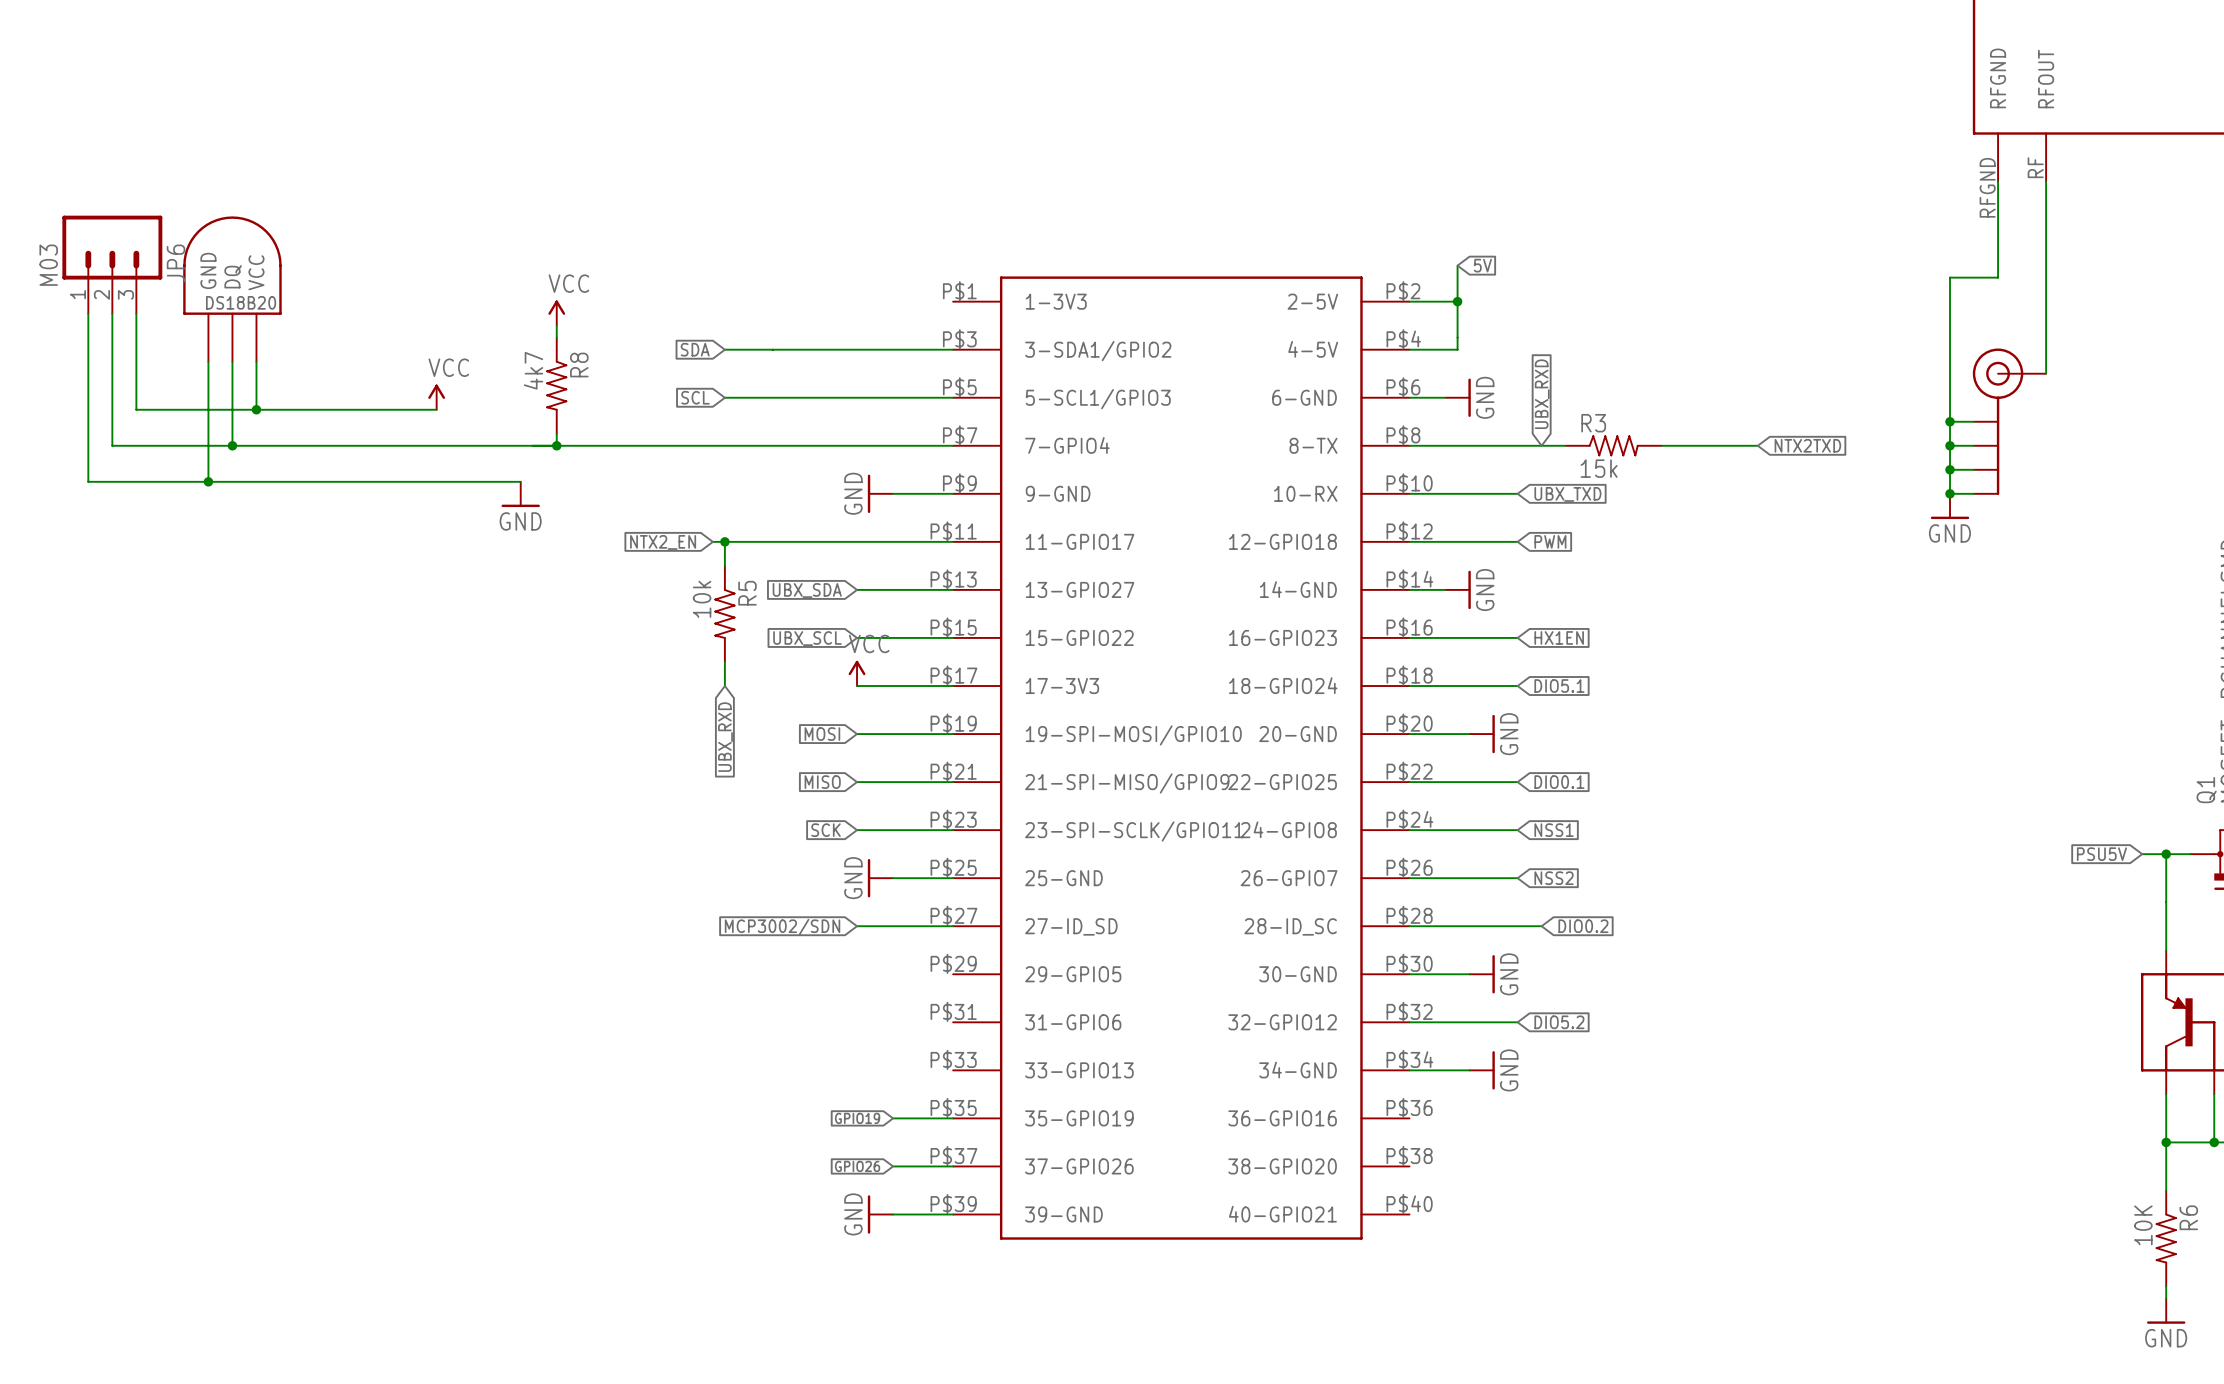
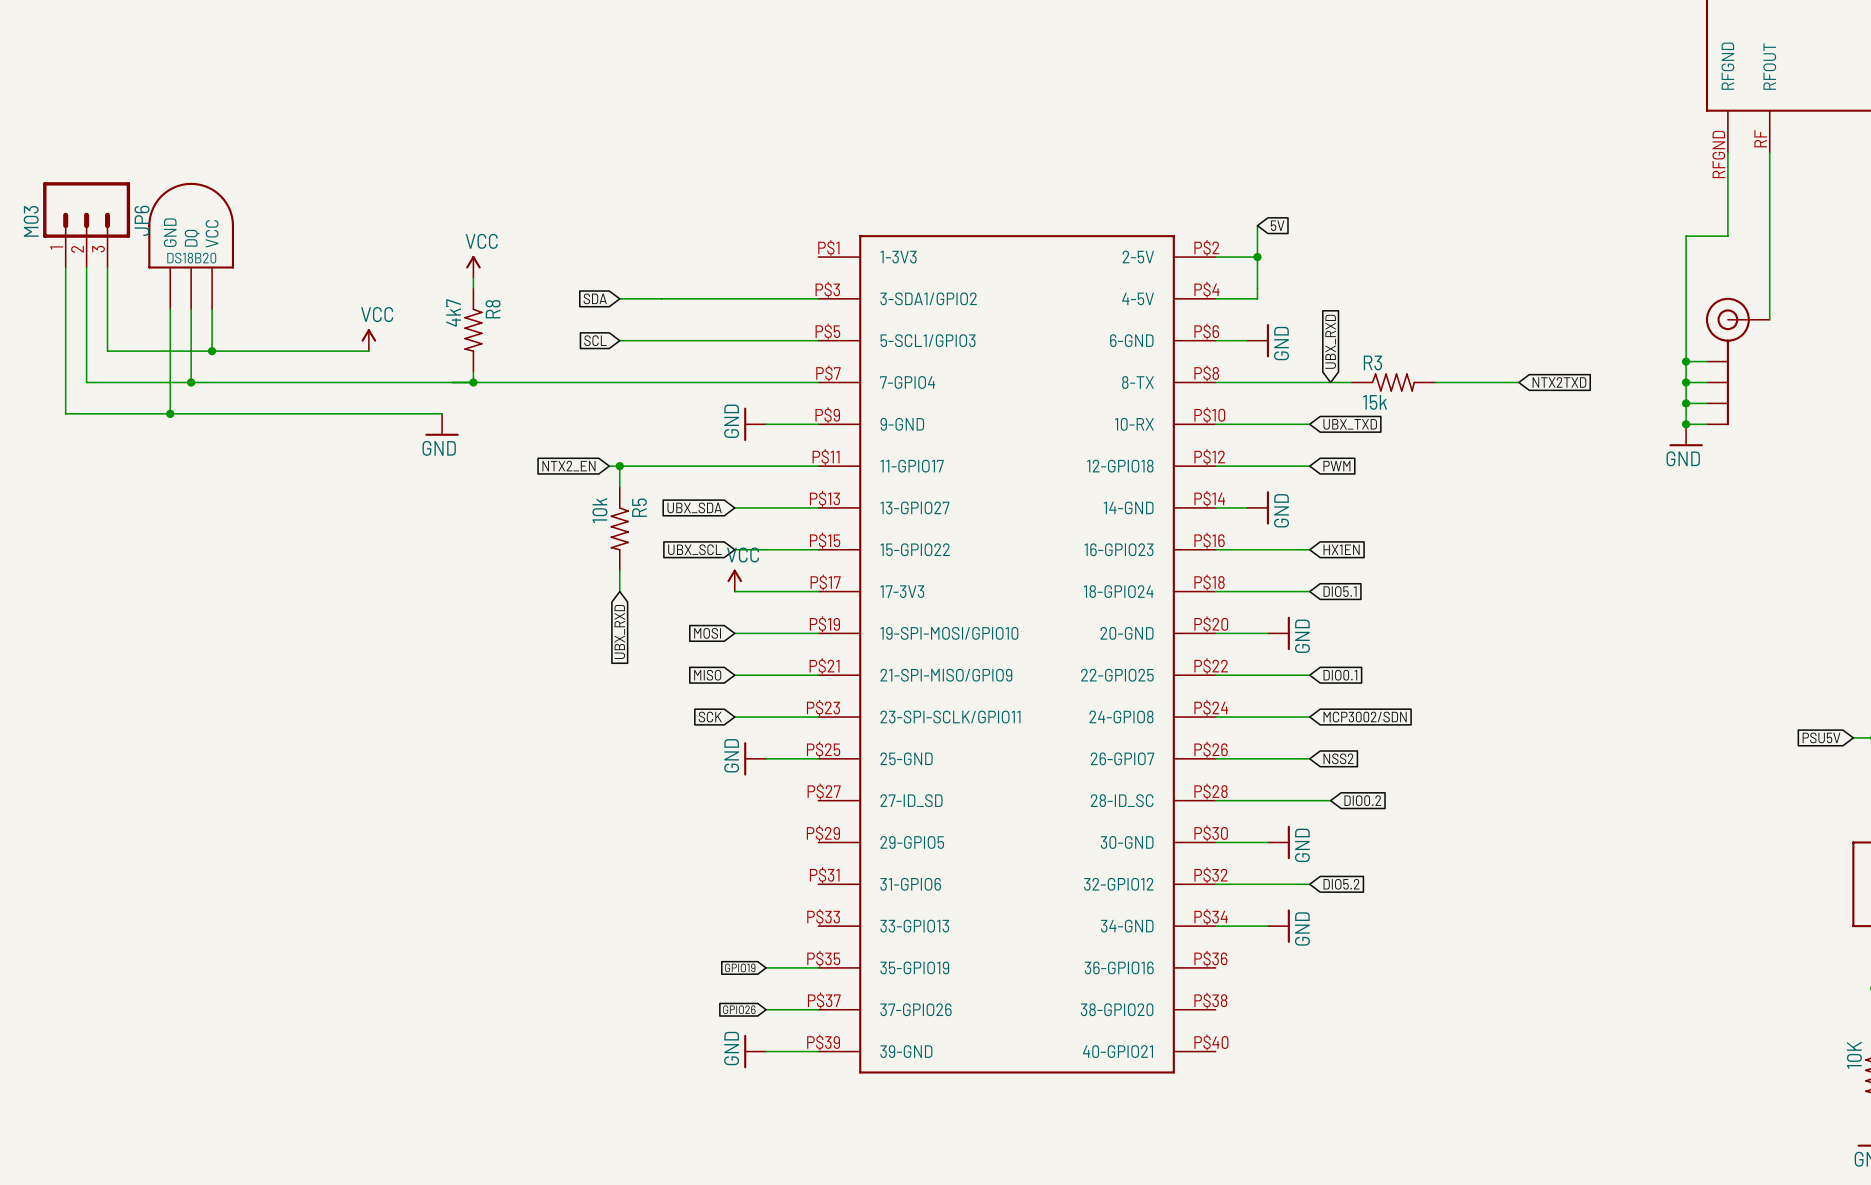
global label: NSS1 (1554, 830) -> MCP3002/SDN (1365, 717)
wire: (857, 926) (953, 926) -> none
global label: MCP3002/SDN (782, 927) -> none

